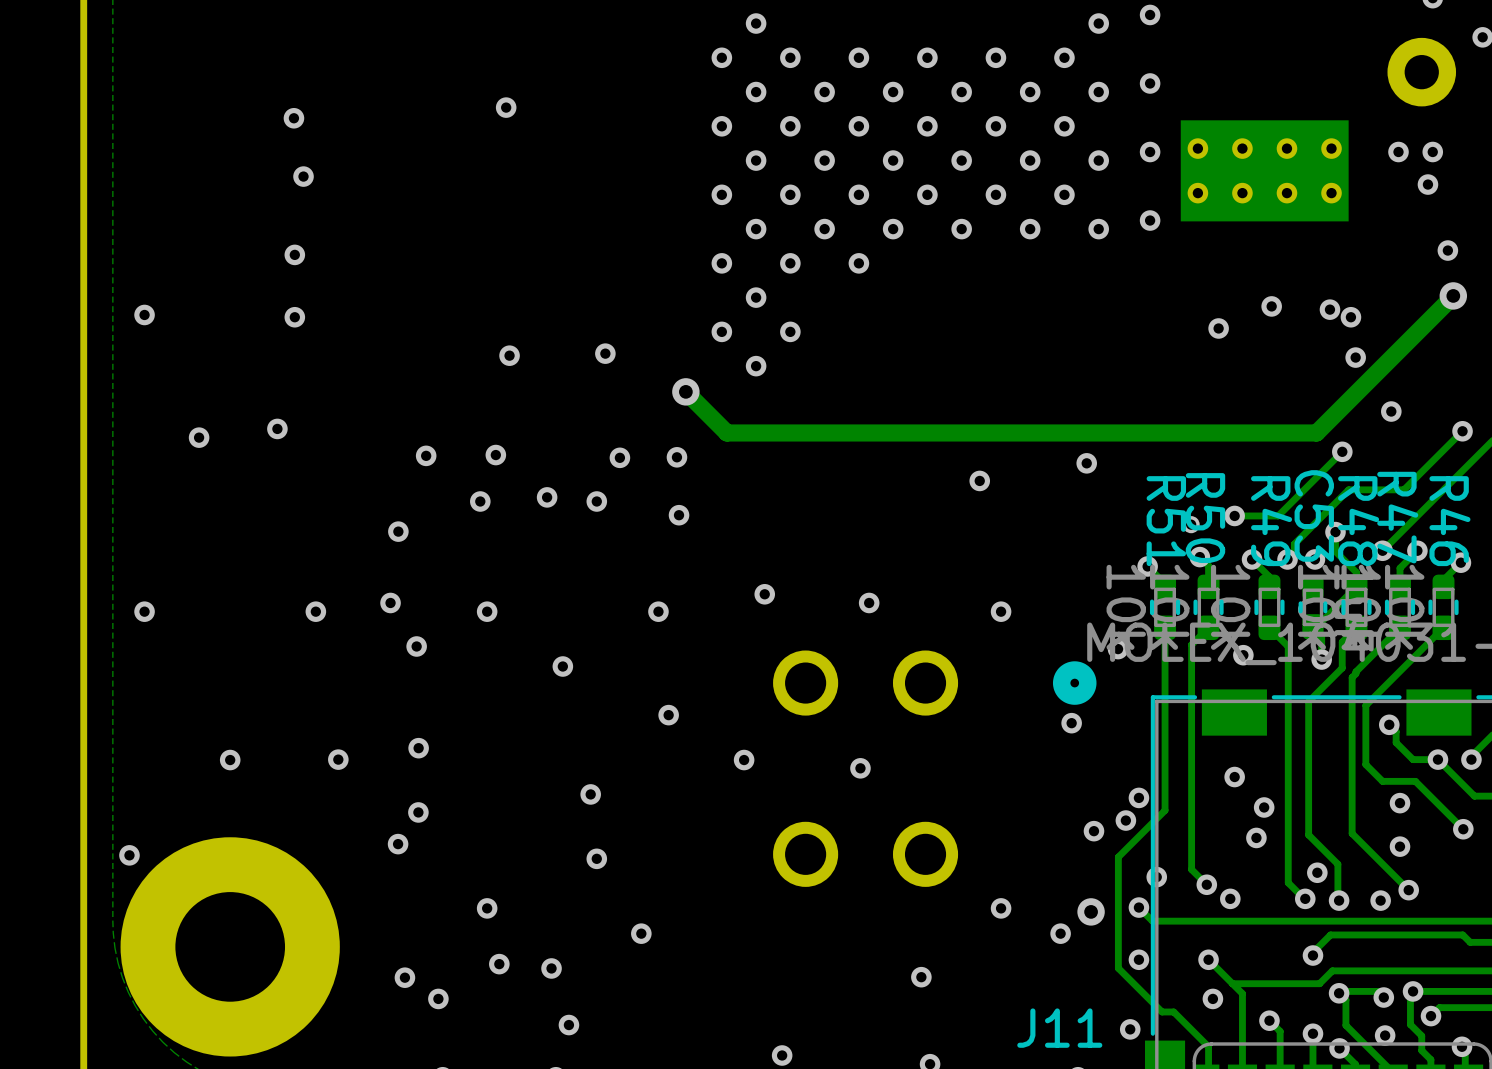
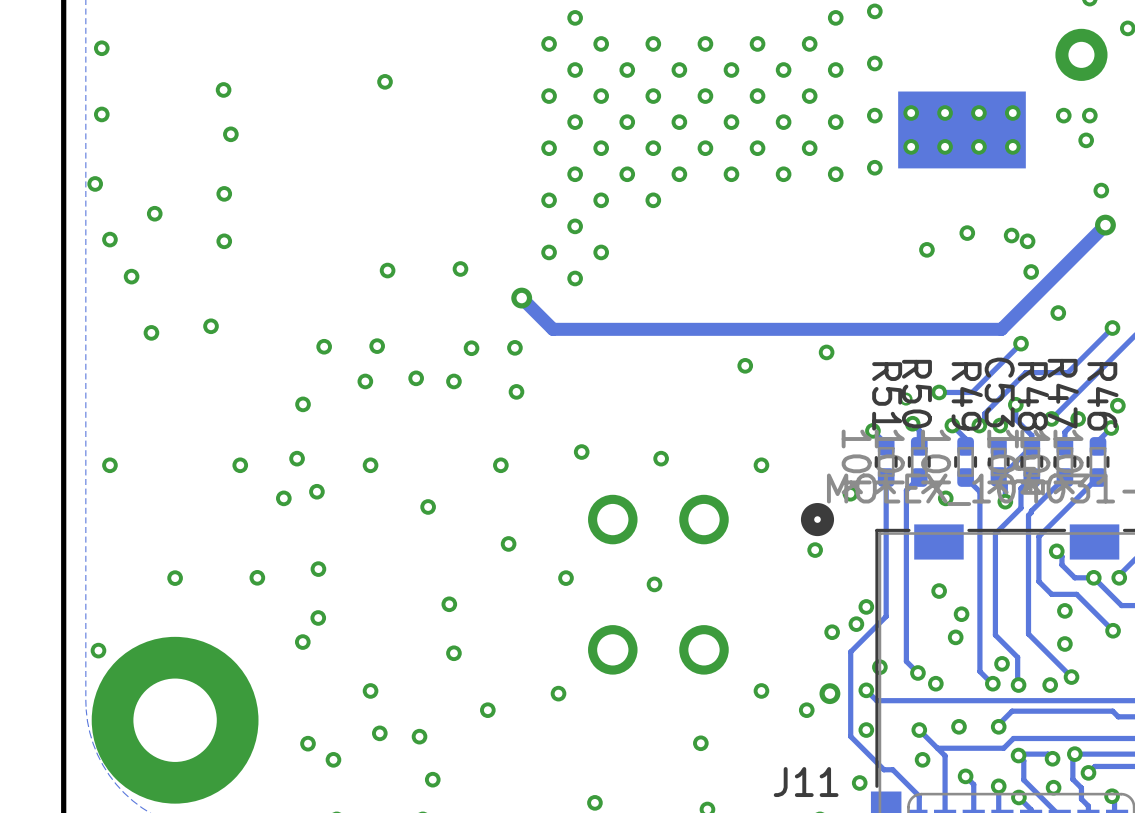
via: none -> (101, 48)
via: none -> (101, 114)
via: none -> (95, 183)
via: none -> (154, 213)
via: none -> (131, 276)
via: none -> (1117, 405)
via: none -> (283, 498)
via: none -> (558, 693)
via: none -> (958, 726)

